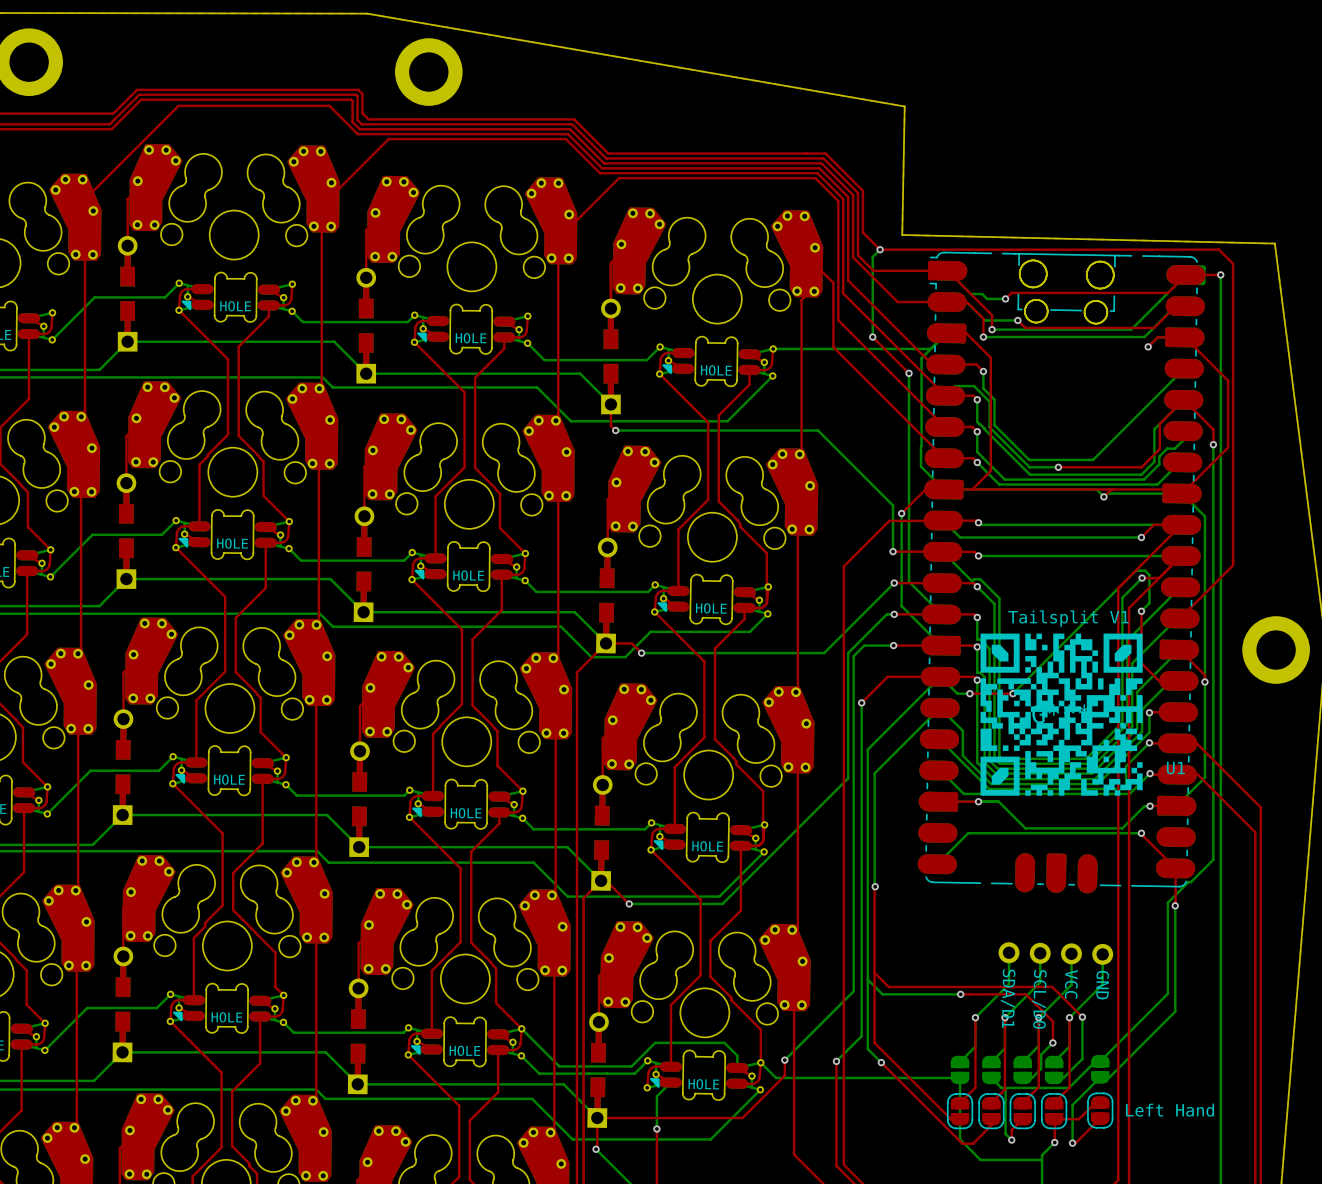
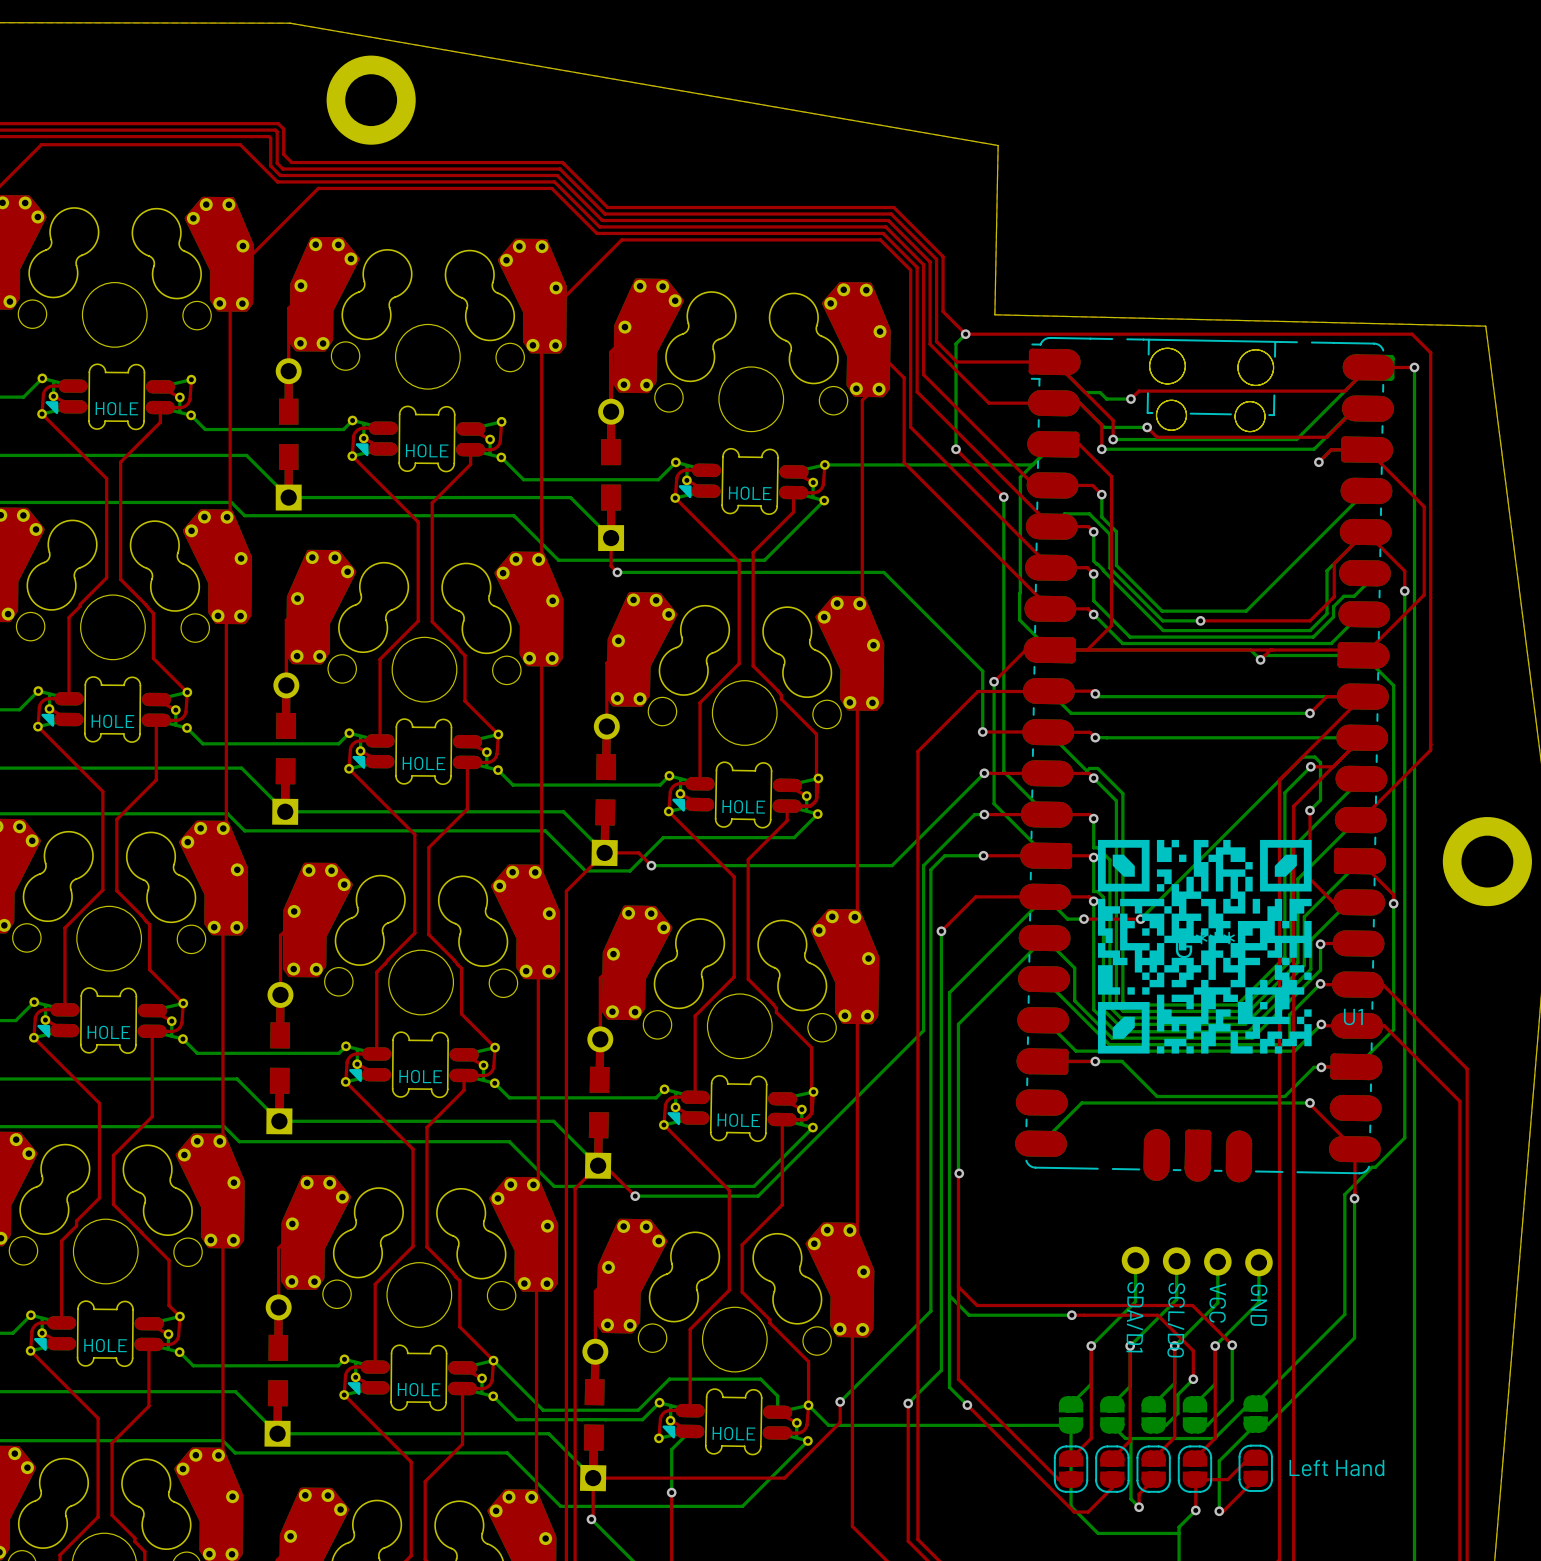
text: Tailsplit V1 (1068, 618) -> none

